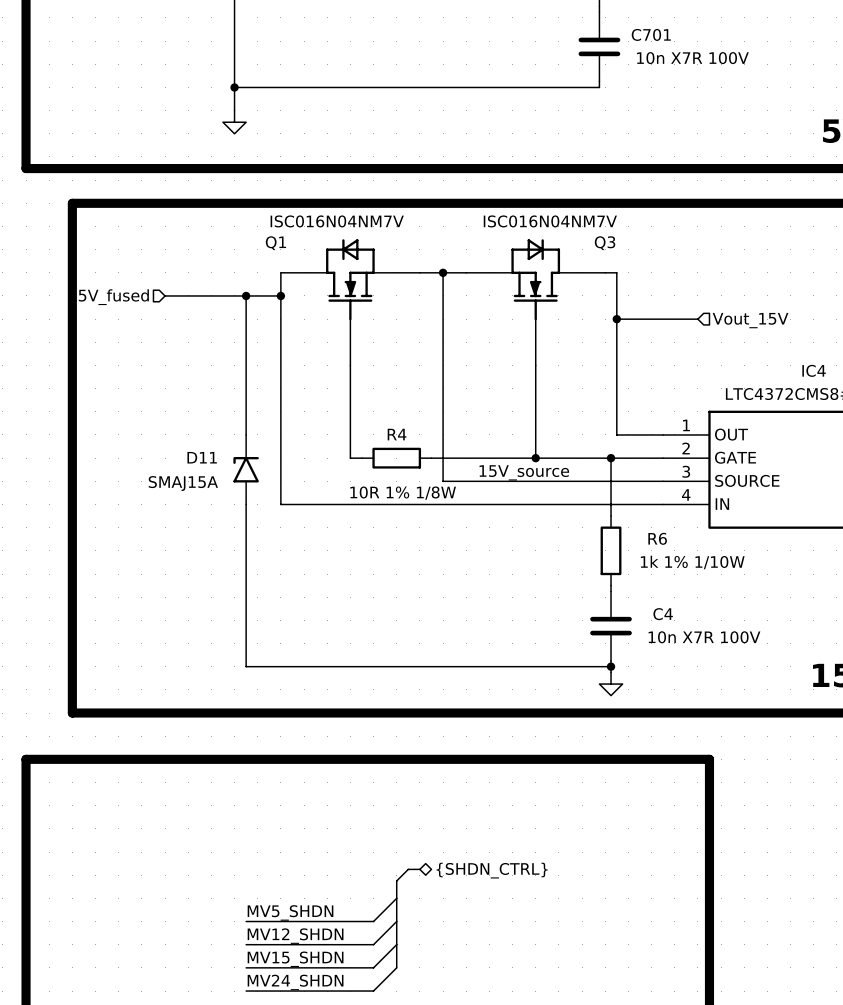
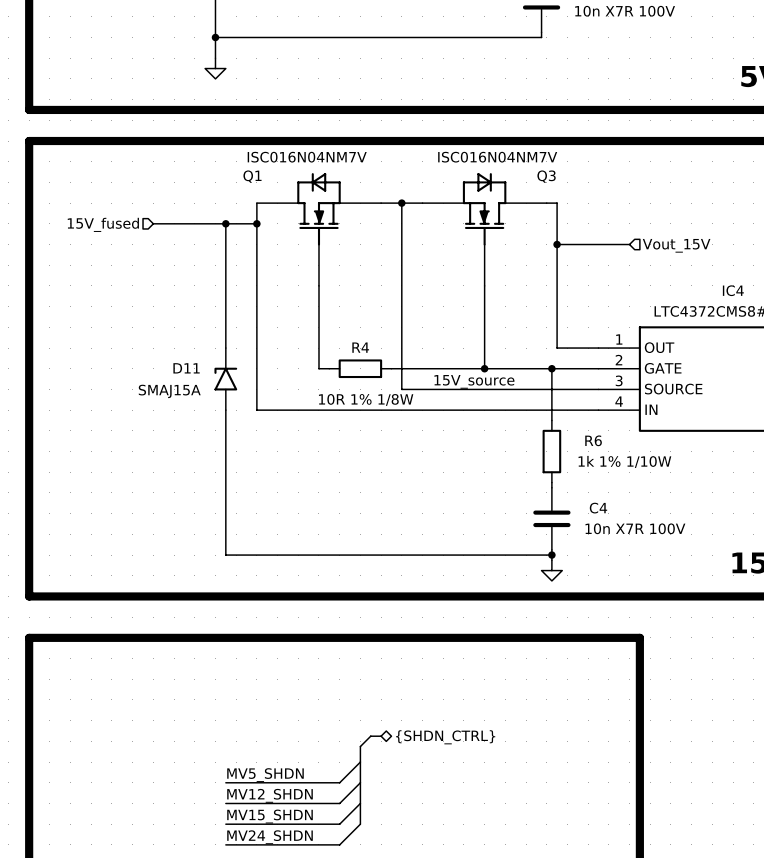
line: (72, 203) (72, 713) -> (70, 141) (29, 141) (29, 596) (70, 596)

